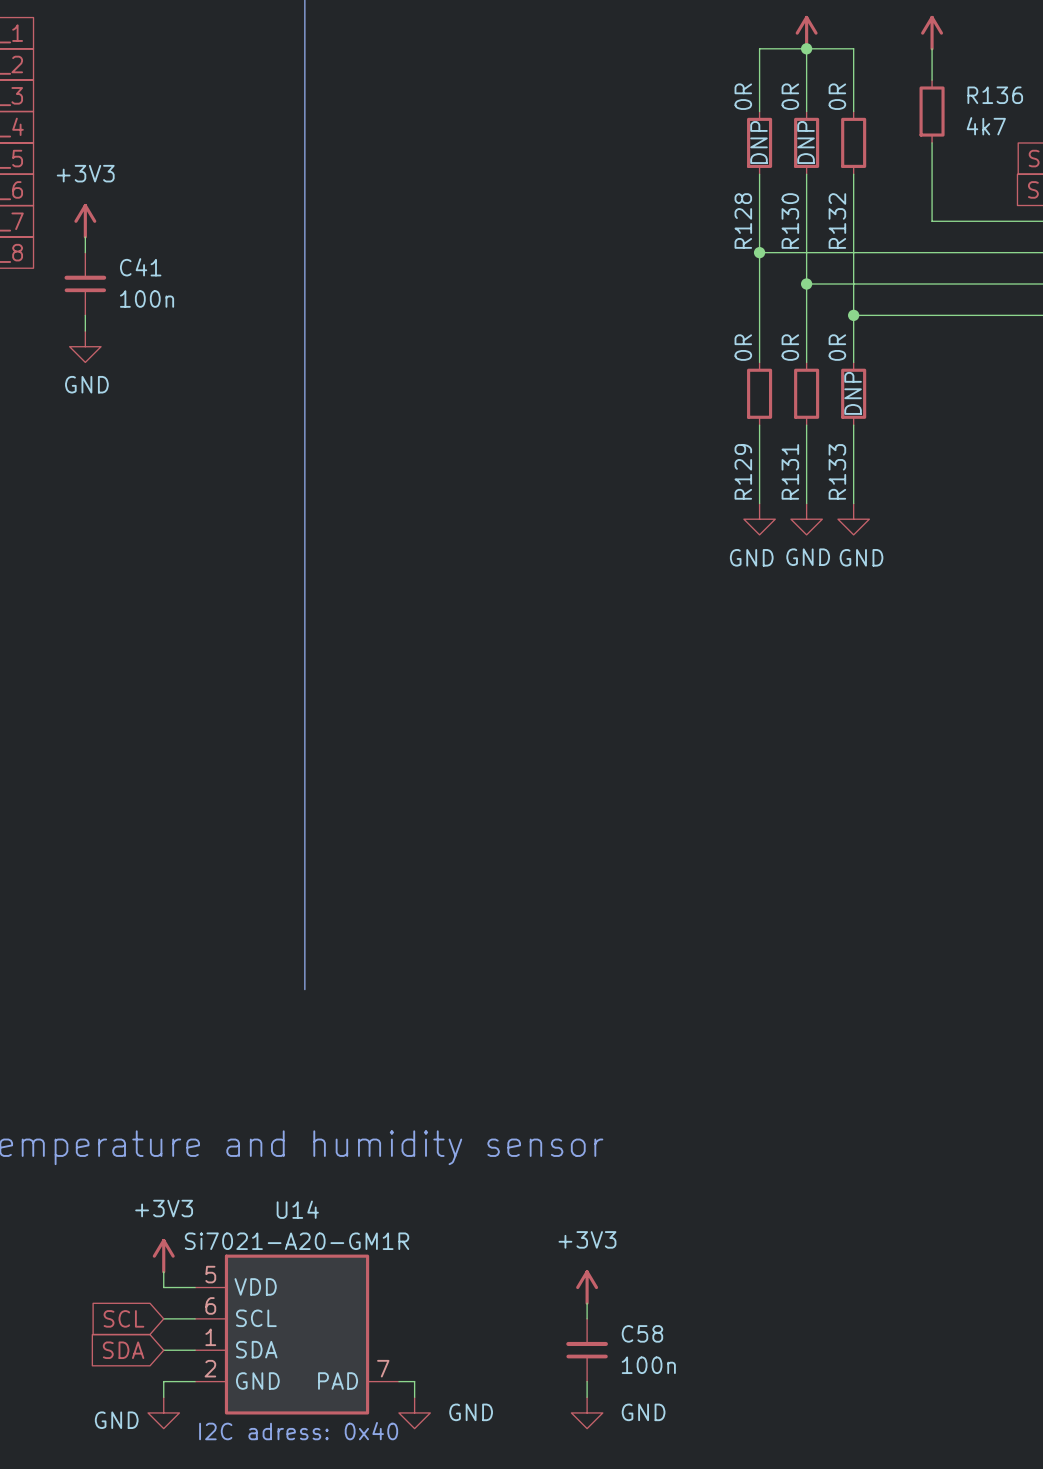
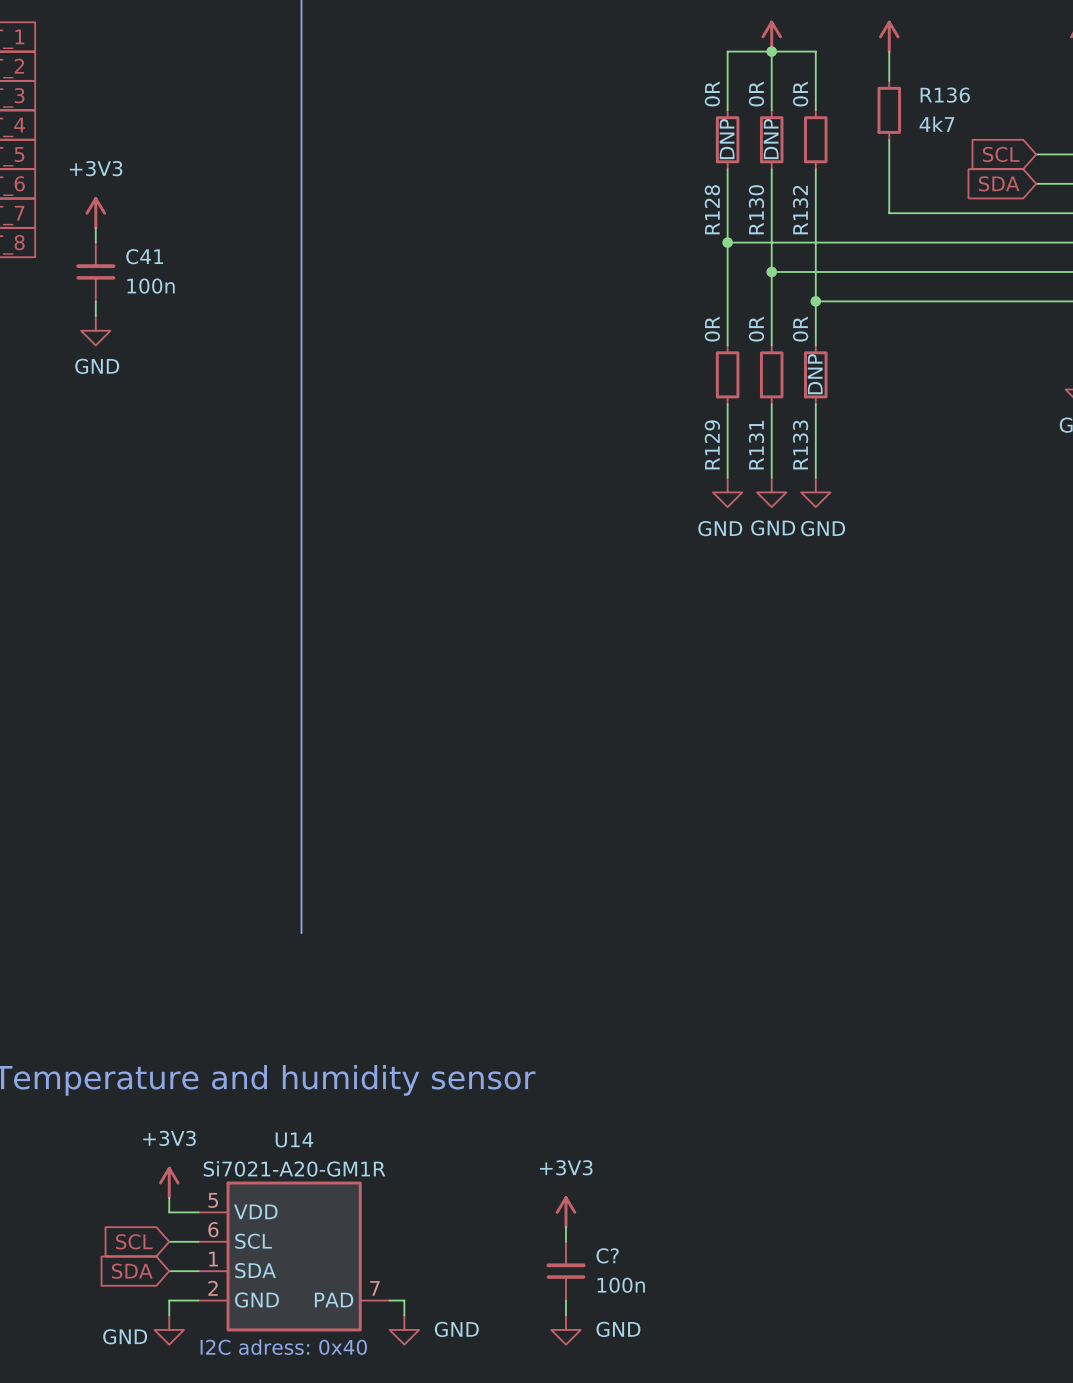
C58 name: C58 (642, 1333) -> C? (607, 1255)

